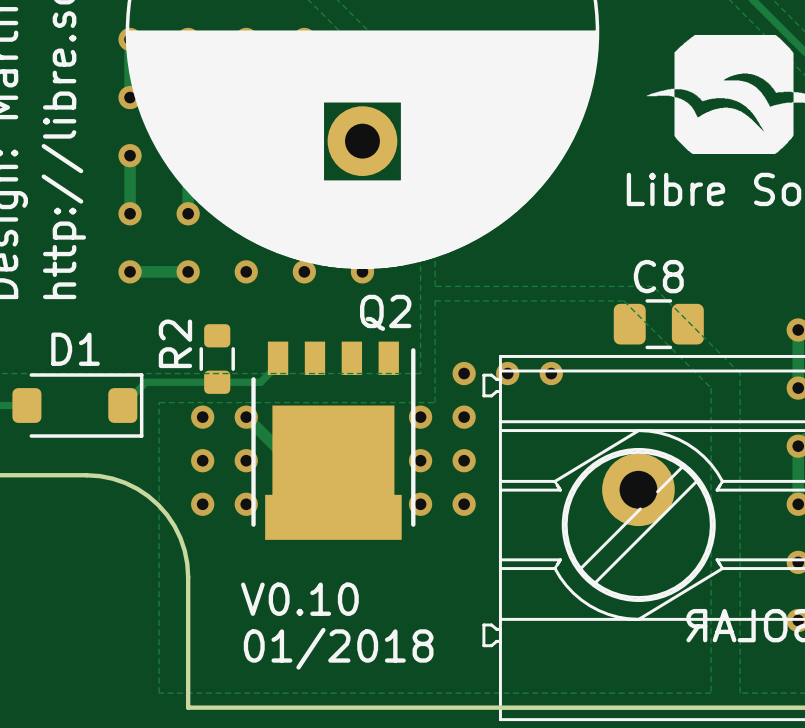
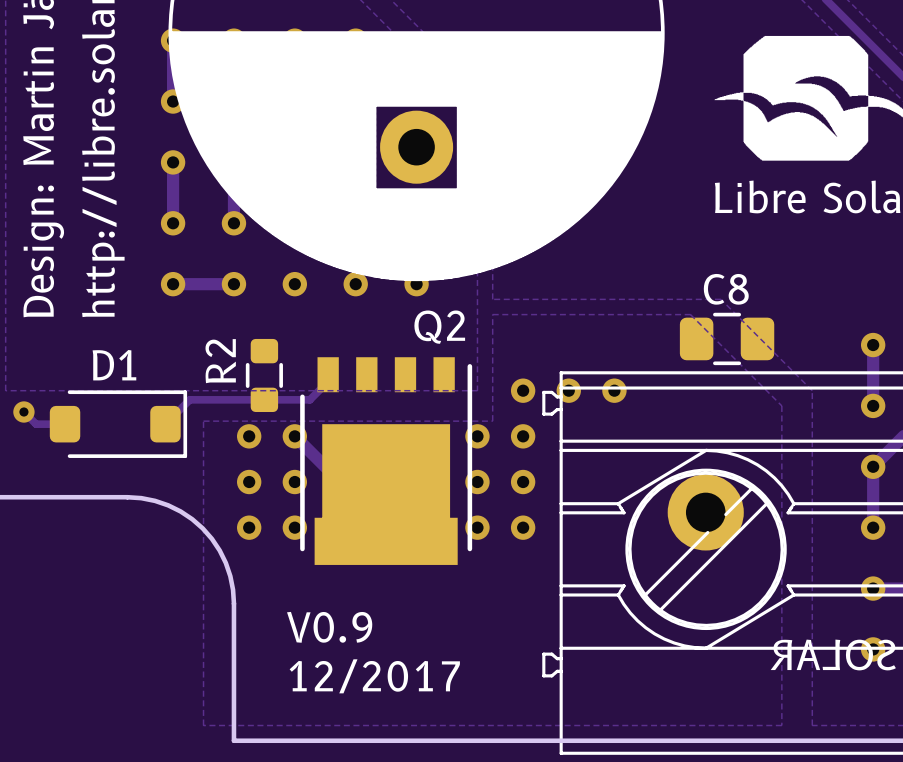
text: V0.10 (299, 599) -> V0.9 (329, 627)
text: 01/2018 (338, 648) -> 12/2017 (374, 676)

